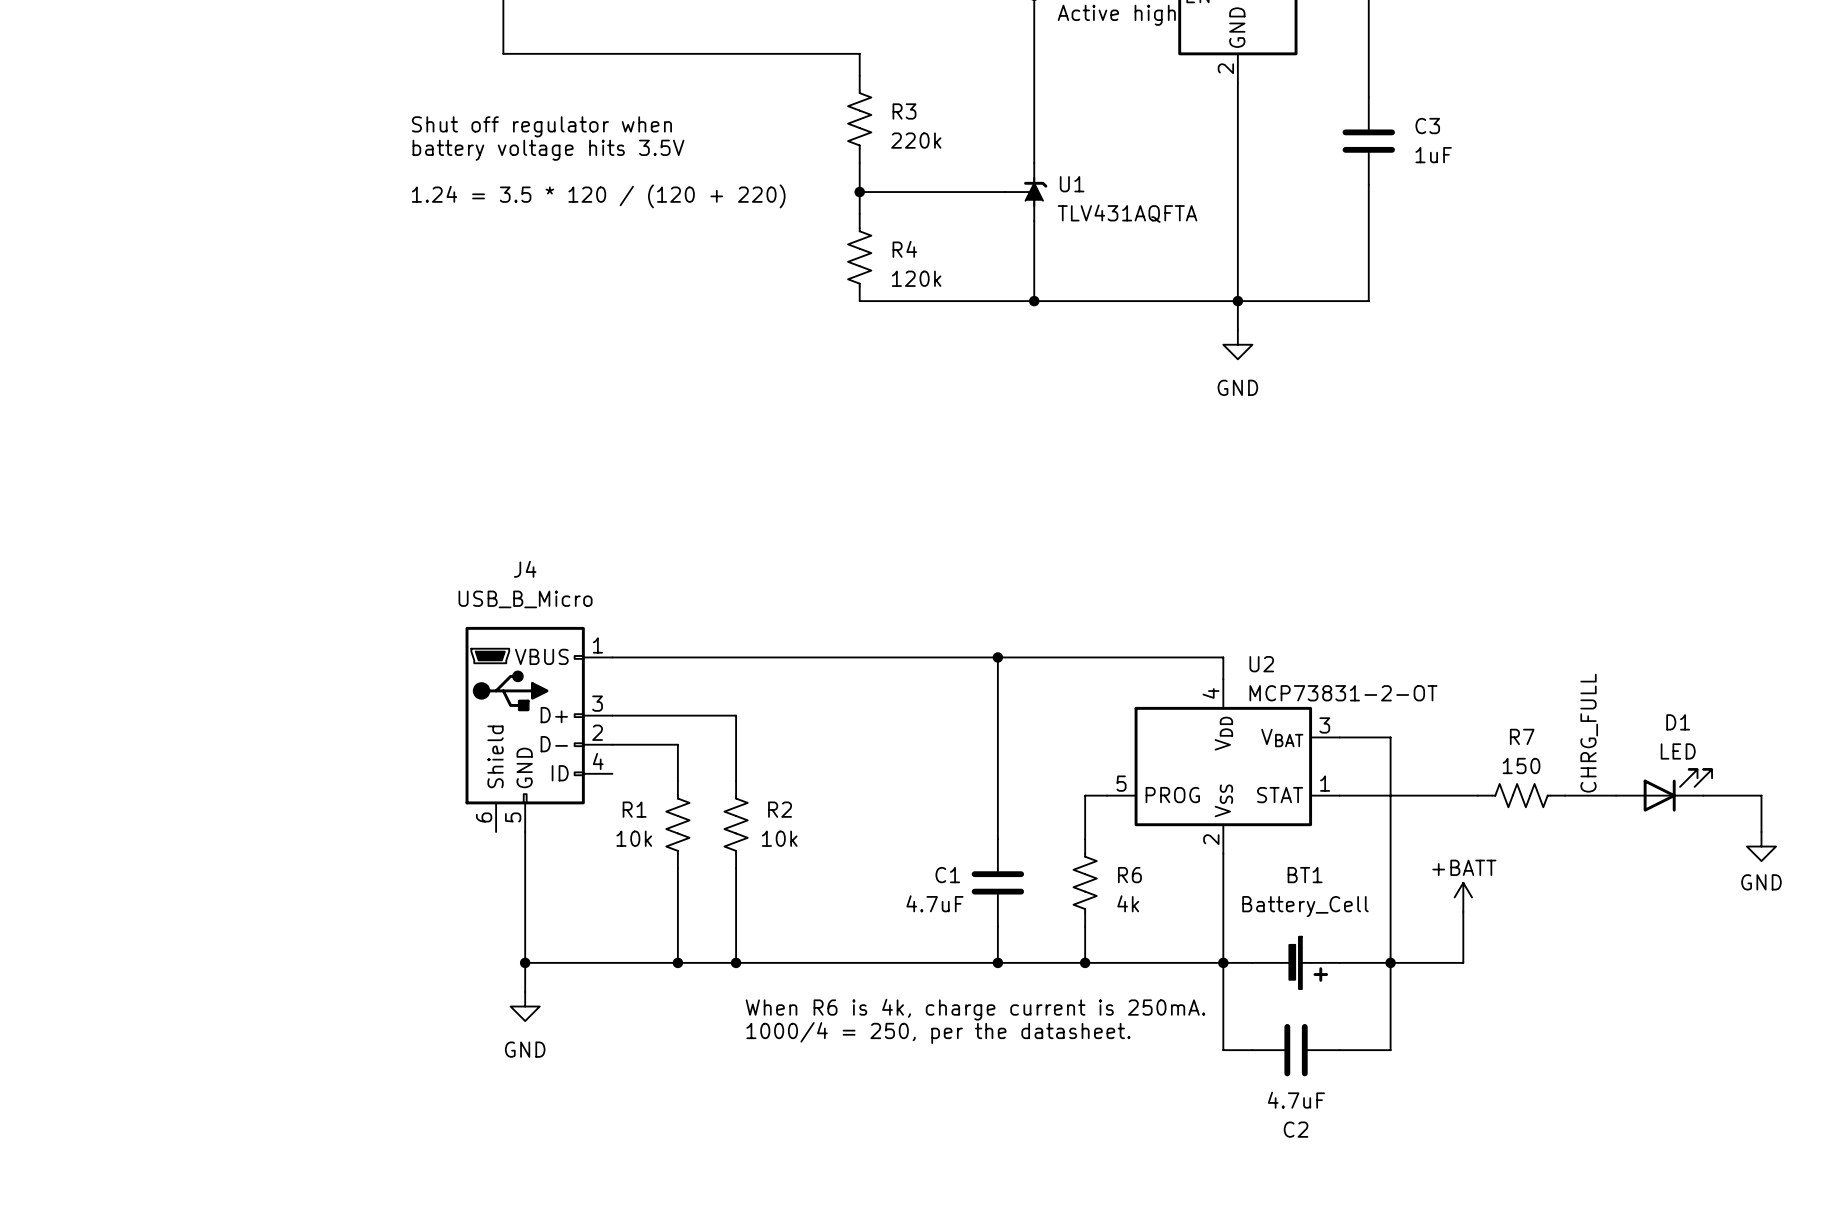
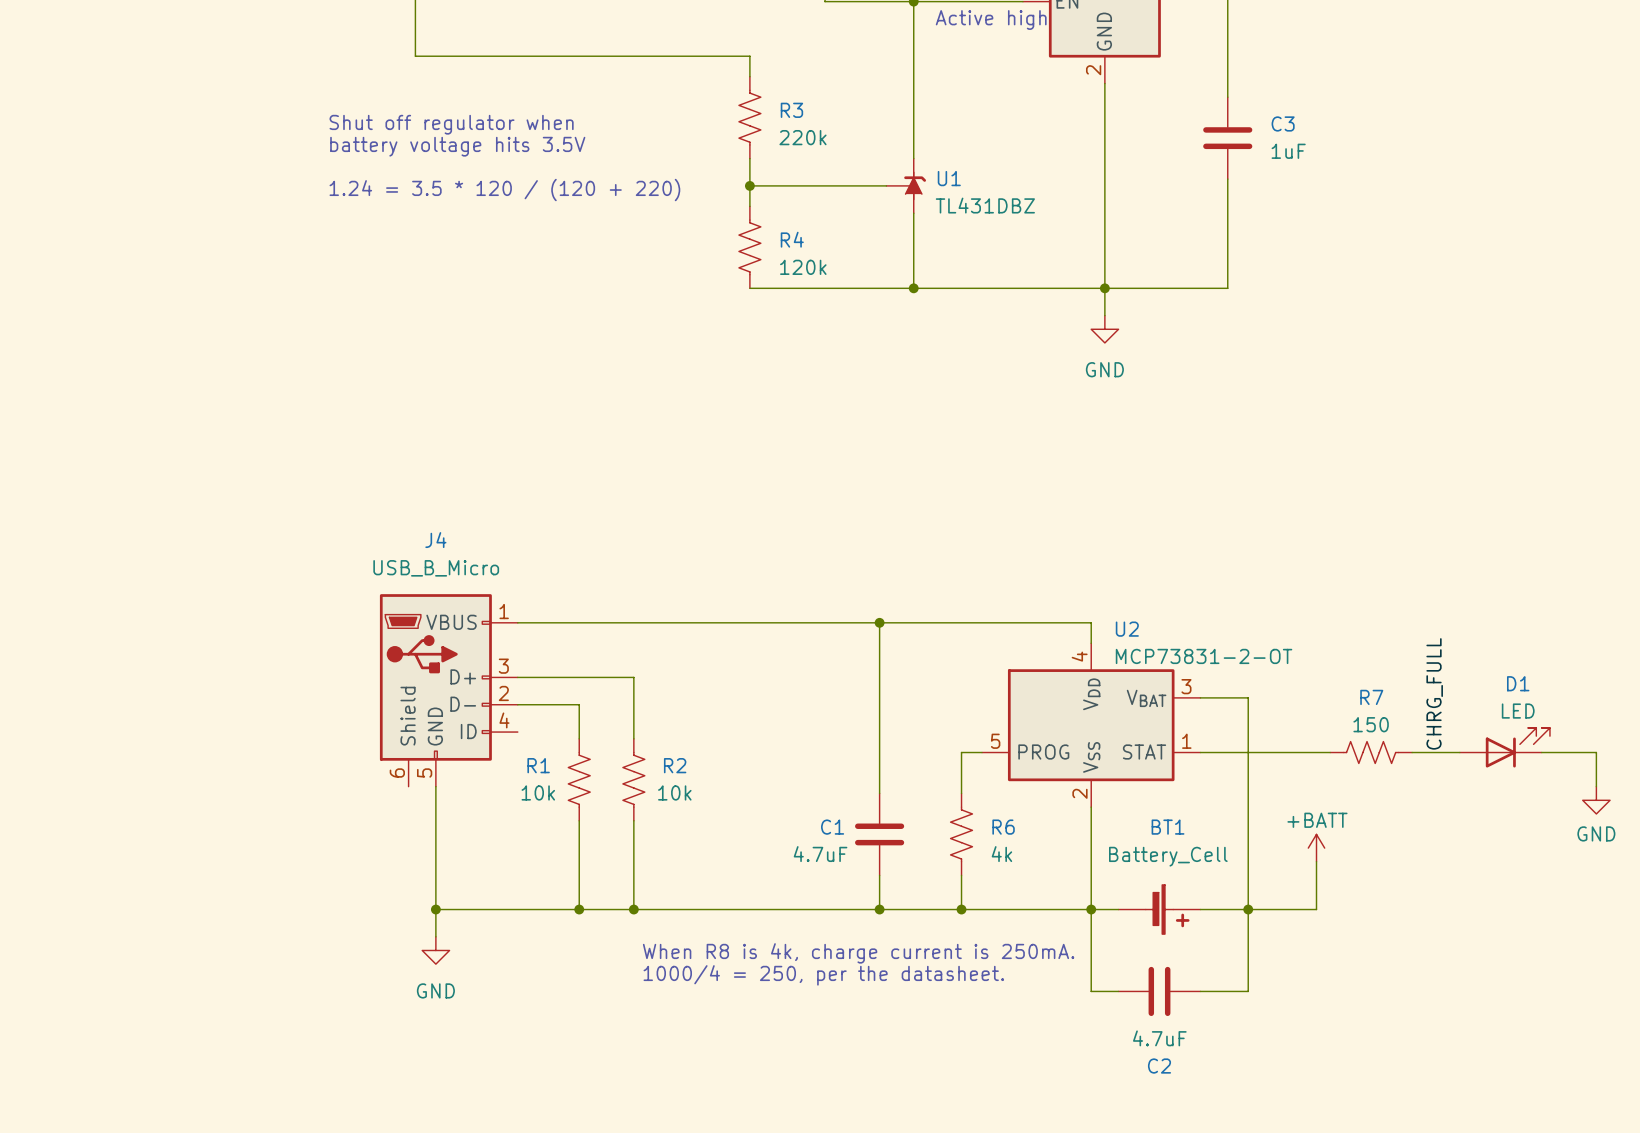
U1 value: TLV431AQFTA (1127, 213) -> TL431DBZ (985, 205)
text: When R6 is 4k, charge current is 250mA. (975, 1009) -> When R8 is 4k, charge current is 250mA. (858, 953)

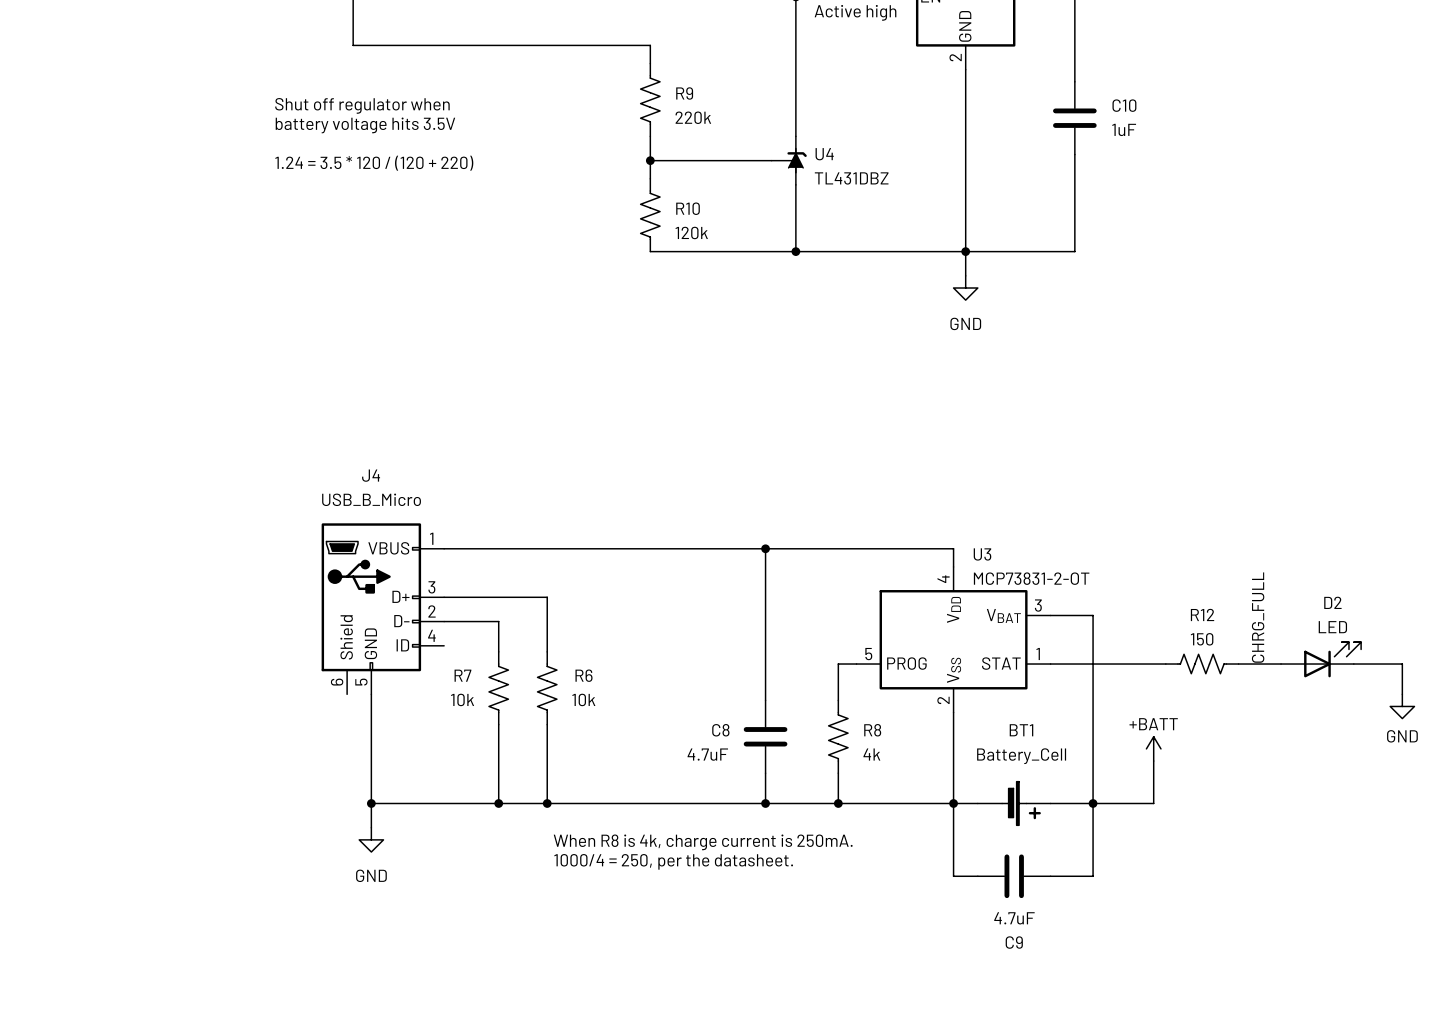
R3 name: R3 (791, 110) -> R9 (684, 93)
C3 name: C3 (1283, 123) -> C10 (1124, 105)
U1 name: U1 (949, 178) -> U4 (824, 154)
R4 name: R4 (792, 239) -> R10 (688, 208)
U2 name: U2 (1127, 629) -> U3 (982, 554)
D1 name: D1 (1518, 683) -> D2 (1332, 602)
R7 name: R7 (1371, 697) -> R12 (1202, 614)
R1 name: R1 (538, 765) -> R7 (462, 675)
R2 name: R2 (675, 765) -> R6 (584, 675)
C1 name: C1 (832, 827) -> C8 (720, 730)
R6 name: R6 (1003, 827) -> R8 (872, 730)
C2 name: C2 (1159, 1066) -> C9 (1014, 942)

